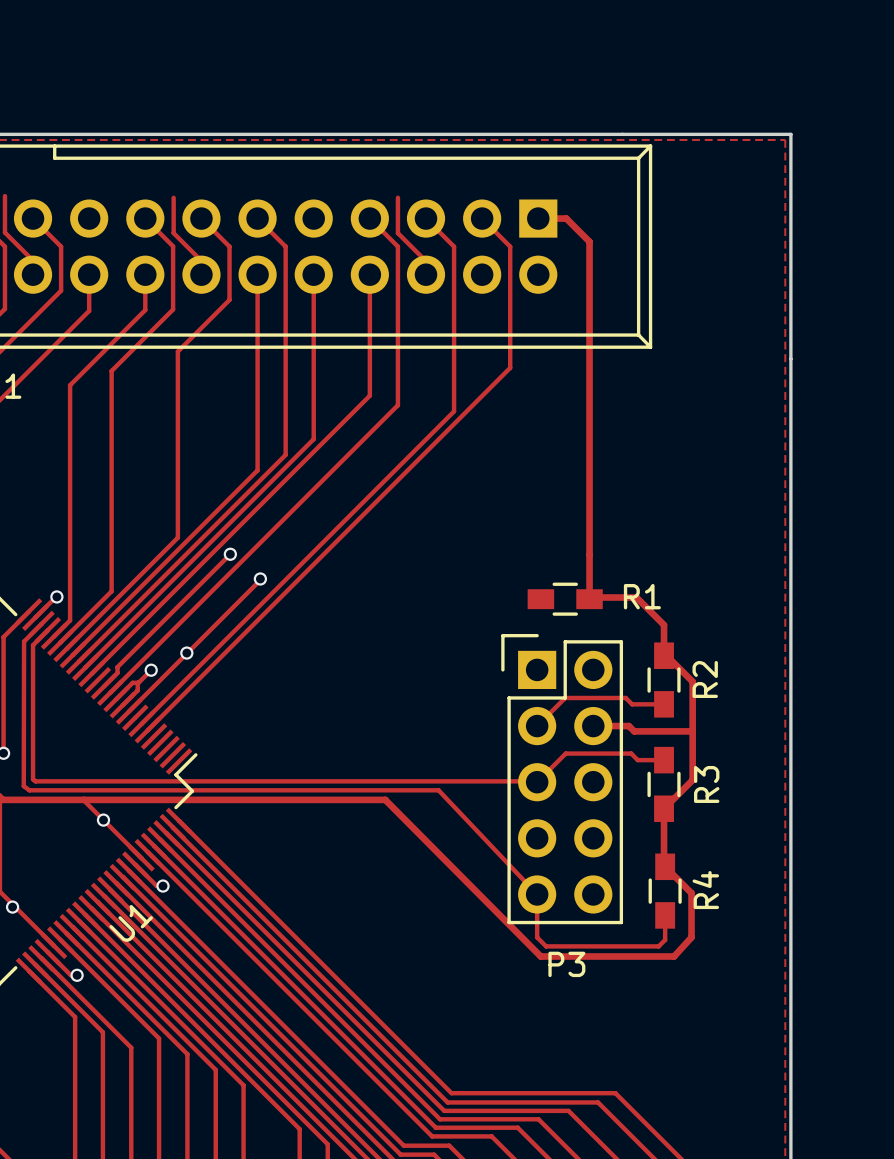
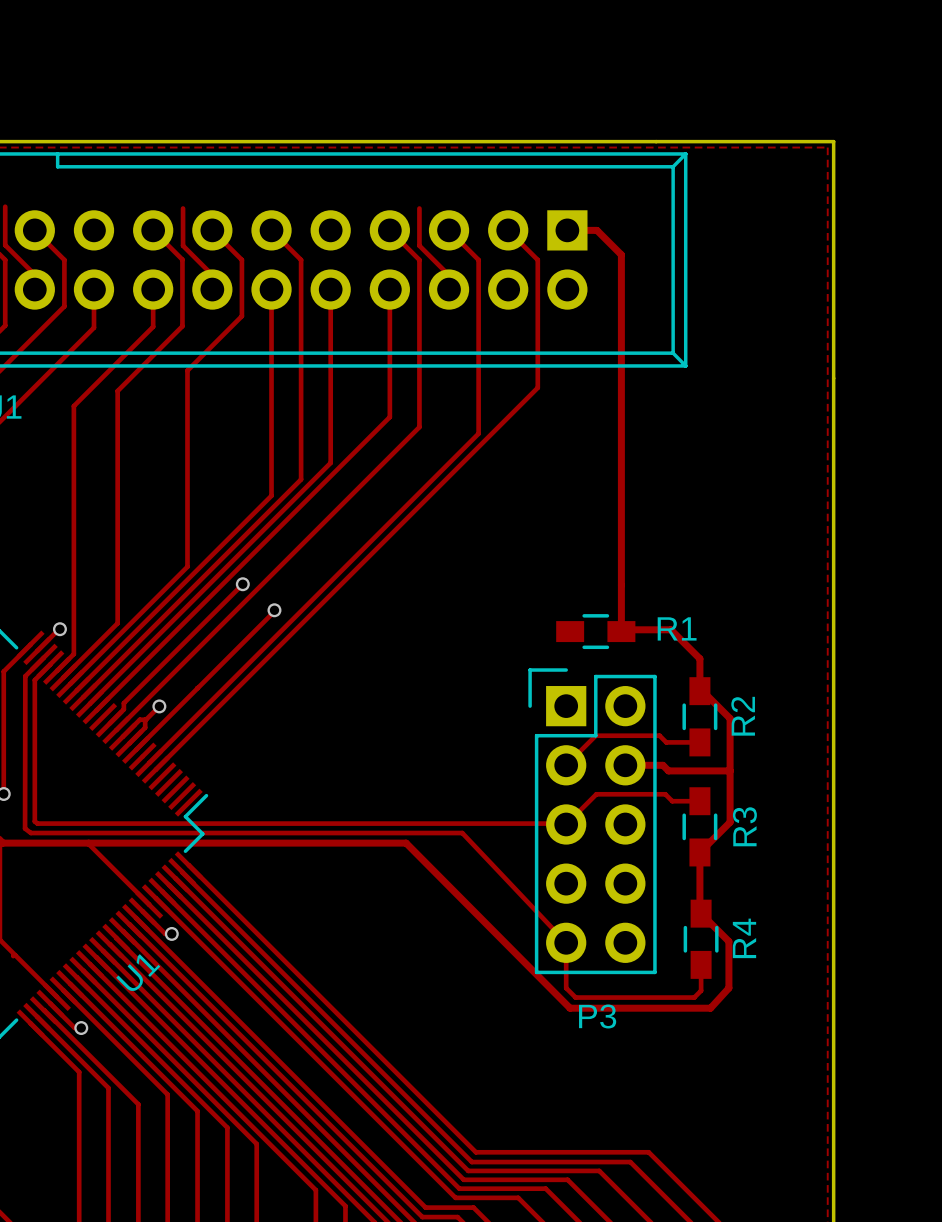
via: (186, 653) -> none
via: (103, 820) -> none
via: (12, 907) -> none

